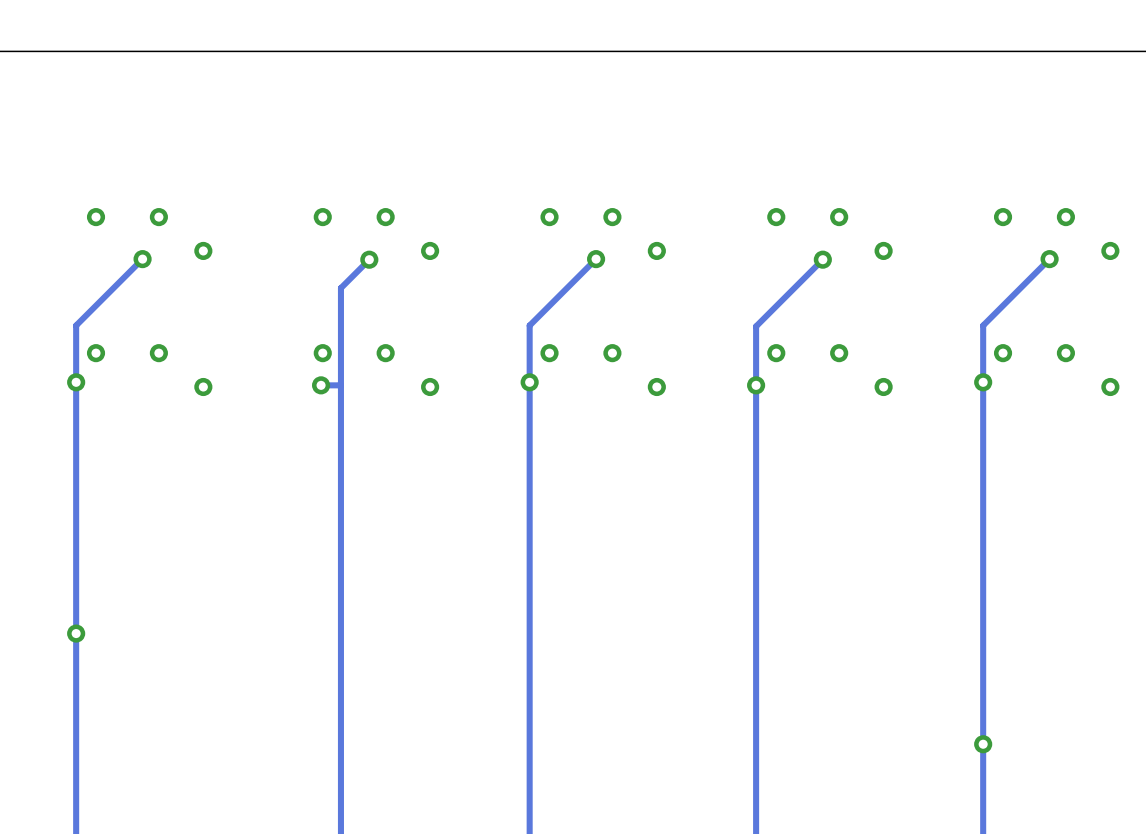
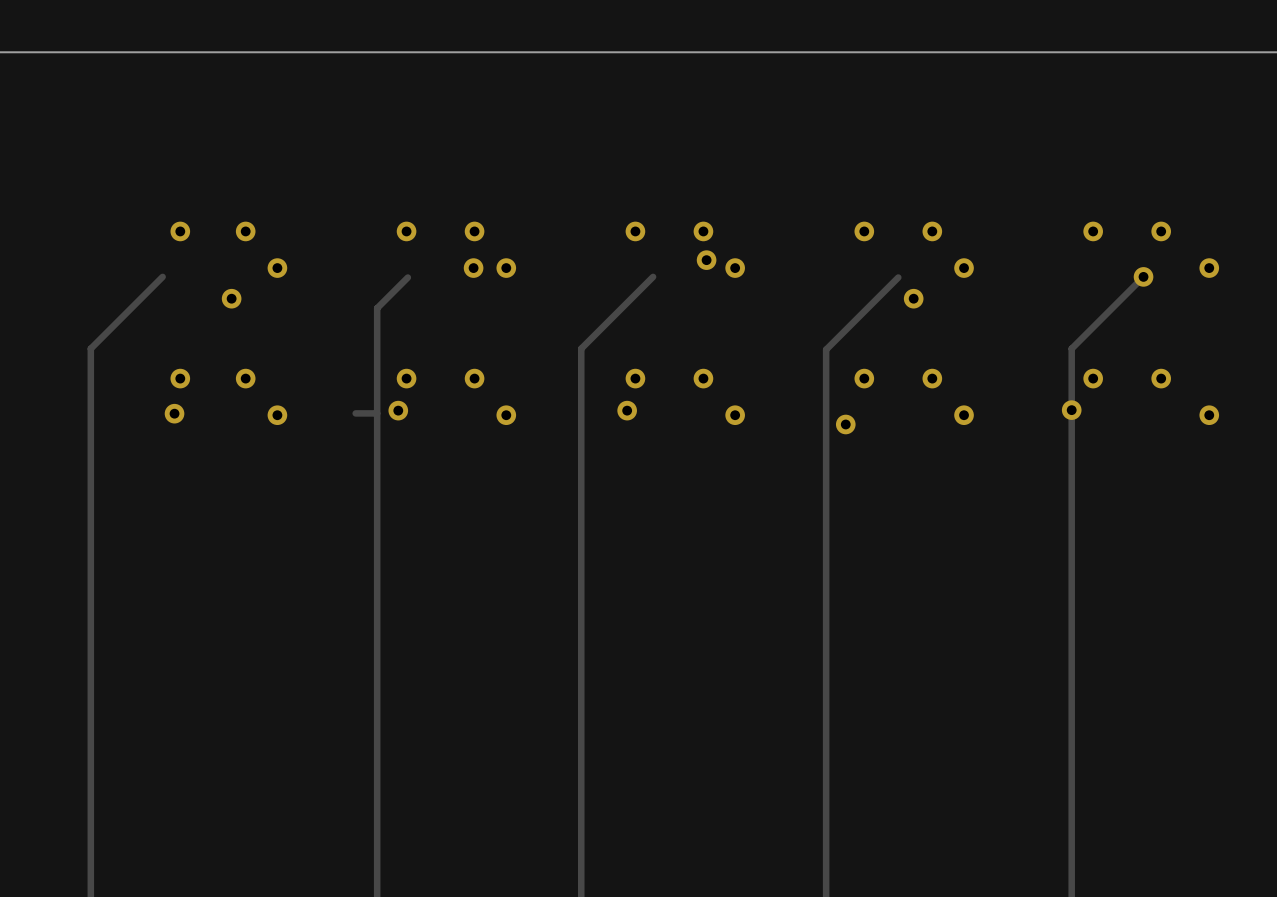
via: (96, 217) -> none
via: none -> (245, 231)
via: (322, 217) -> none
via position: (385, 217) -> (406, 231)
via: none -> (474, 231)
via: (549, 217) -> none
via: none -> (635, 231)
via: (612, 217) -> none
via: none -> (703, 231)
via position: (776, 217) -> (864, 231)
via position: (839, 217) -> (932, 231)
via: none -> (706, 260)
via: (203, 250) -> none
via: none -> (277, 268)
via: none -> (506, 268)
via: (656, 250) -> none
via: none -> (735, 268)
via: (142, 259) -> none
via: (369, 259) -> none
via: (596, 259) -> none
via position: (822, 259) -> (913, 298)
via: none -> (231, 298)
via: (96, 353) -> none
via: none -> (245, 378)
via: (322, 353) -> none
via position: (385, 353) -> (406, 378)
via: none -> (474, 378)
via: (549, 353) -> none
via: none -> (635, 378)
via: (612, 353) -> none
via: none -> (703, 378)
via position: (776, 353) -> (864, 378)
via position: (839, 353) -> (932, 378)
via: (76, 382) -> none
via: none -> (398, 410)
via: (529, 382) -> none
via: none -> (627, 410)
via: none -> (174, 413)
via: (321, 385) -> none
via position: (756, 385) -> (845, 424)
via: (203, 387) -> none
via: none -> (277, 415)
via: (430, 387) -> none
via: none -> (506, 415)
via position: (656, 387) -> (735, 415)
via: (76, 633) -> none
via: (983, 744) -> none

